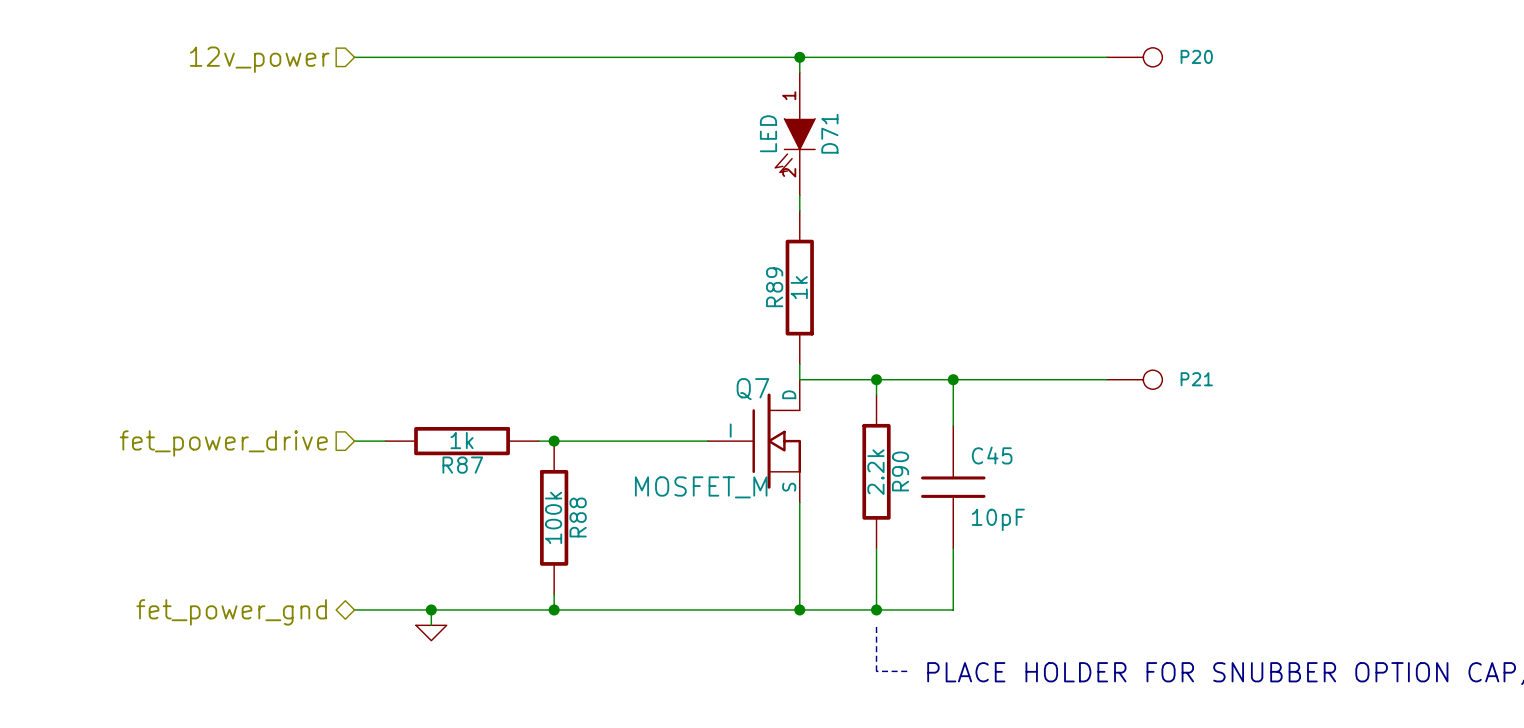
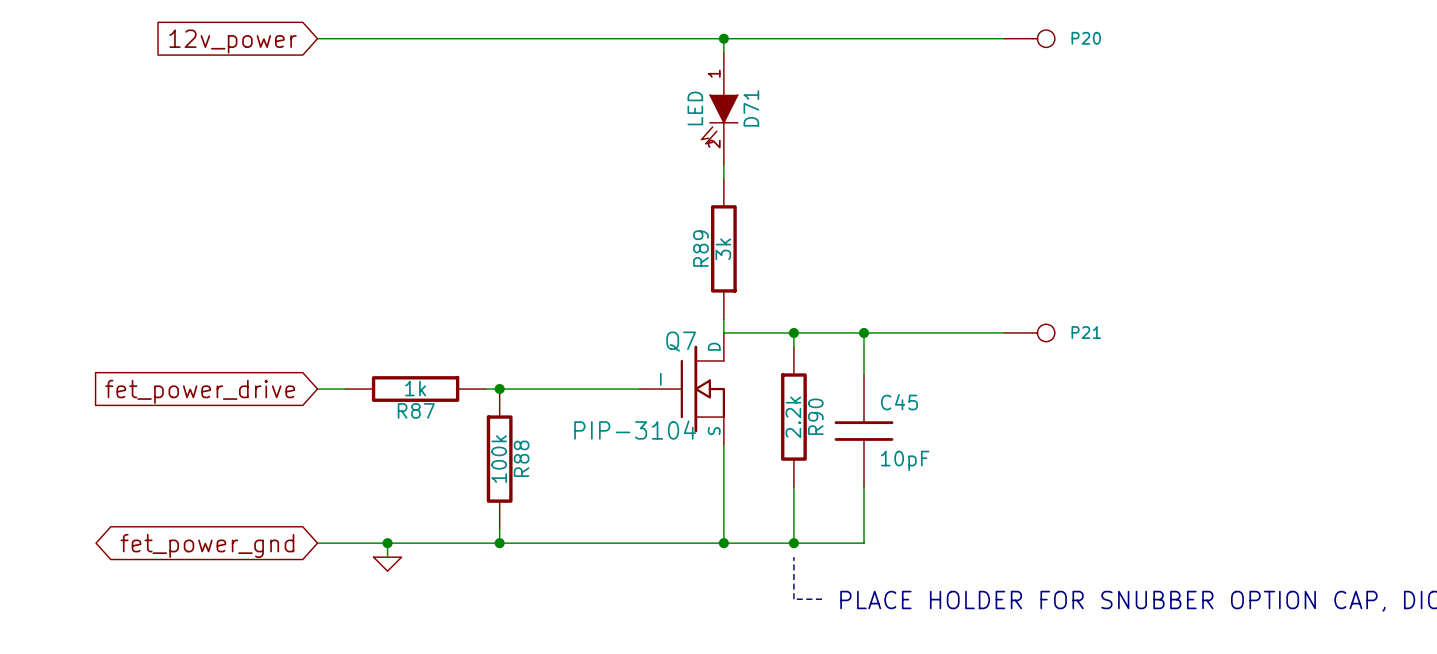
hierarchical label: 12v_power (259, 59) -> none
global label: none -> 12v_power (233, 41)
R89 value: 1k (799, 287) -> 3k (723, 249)
hierarchical label: fet_power_drive (223, 443) -> none
global label: none -> fet_power_drive (200, 391)
Q7 value: MOSFET_M (701, 487) -> PIP-3104 (635, 430)
hierarchical label: fet_power_gnd (231, 612) -> none
global label: none -> fet_power_gnd (207, 545)

